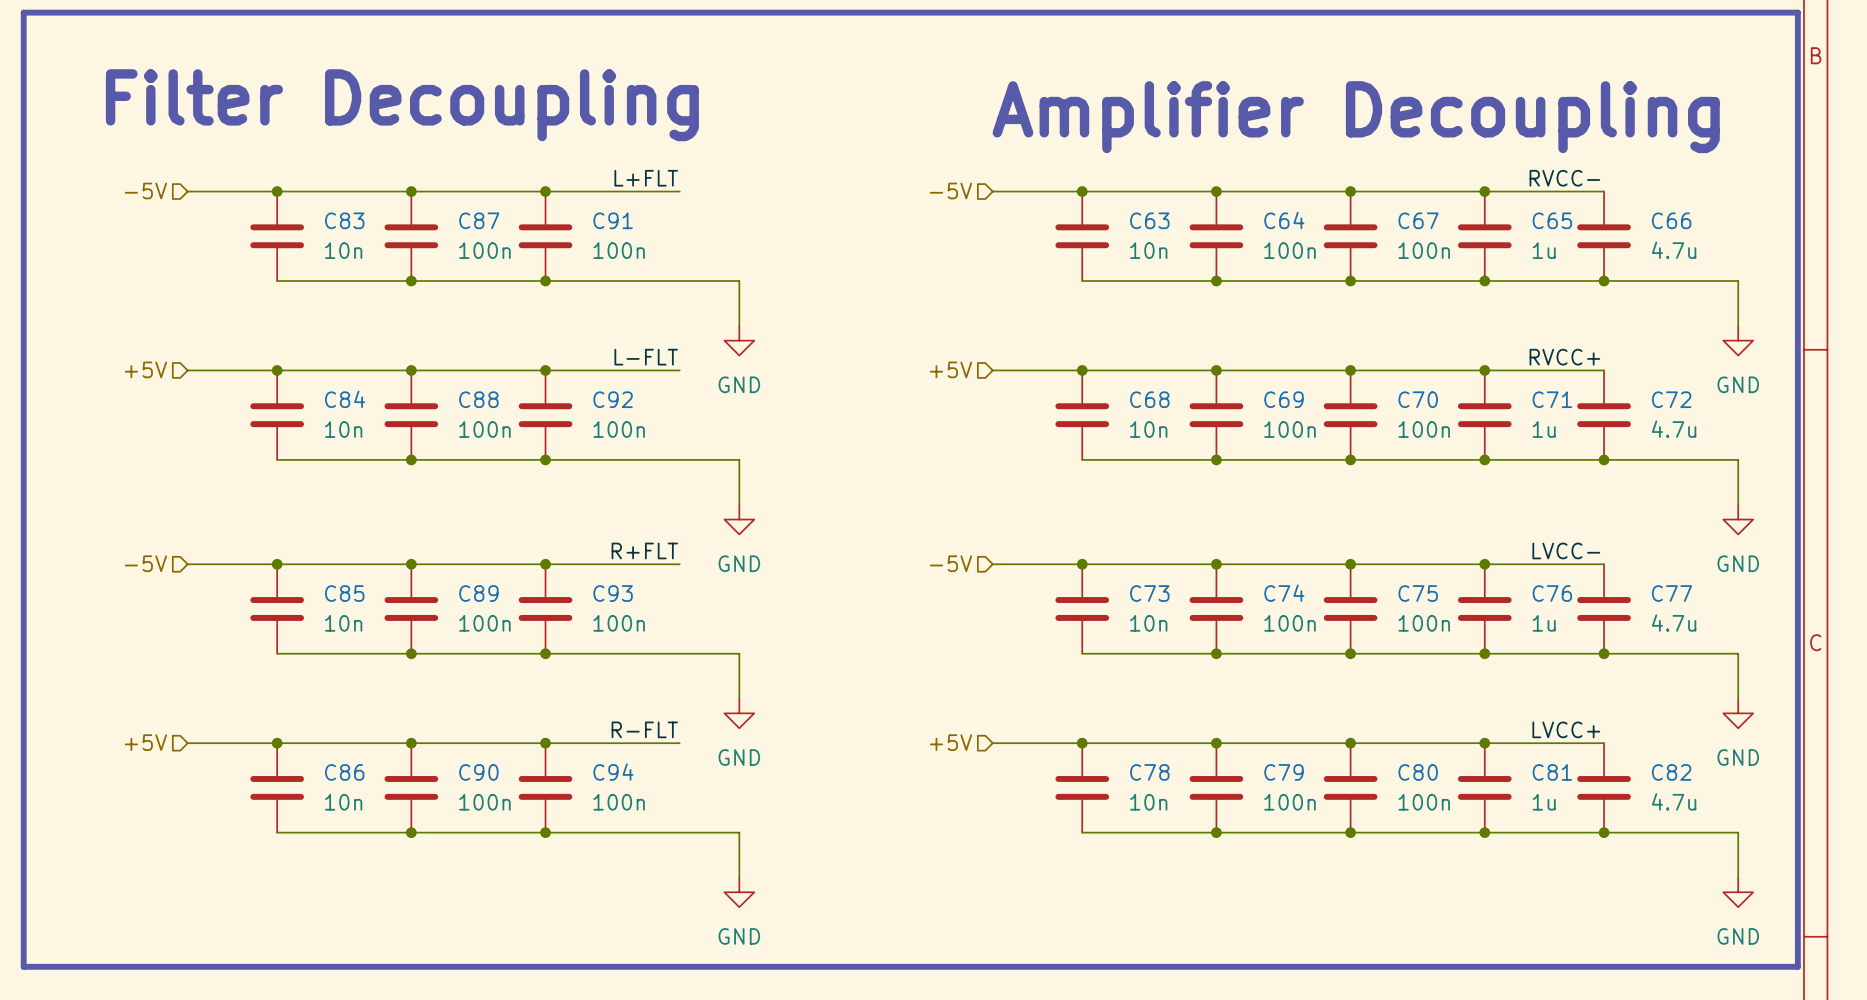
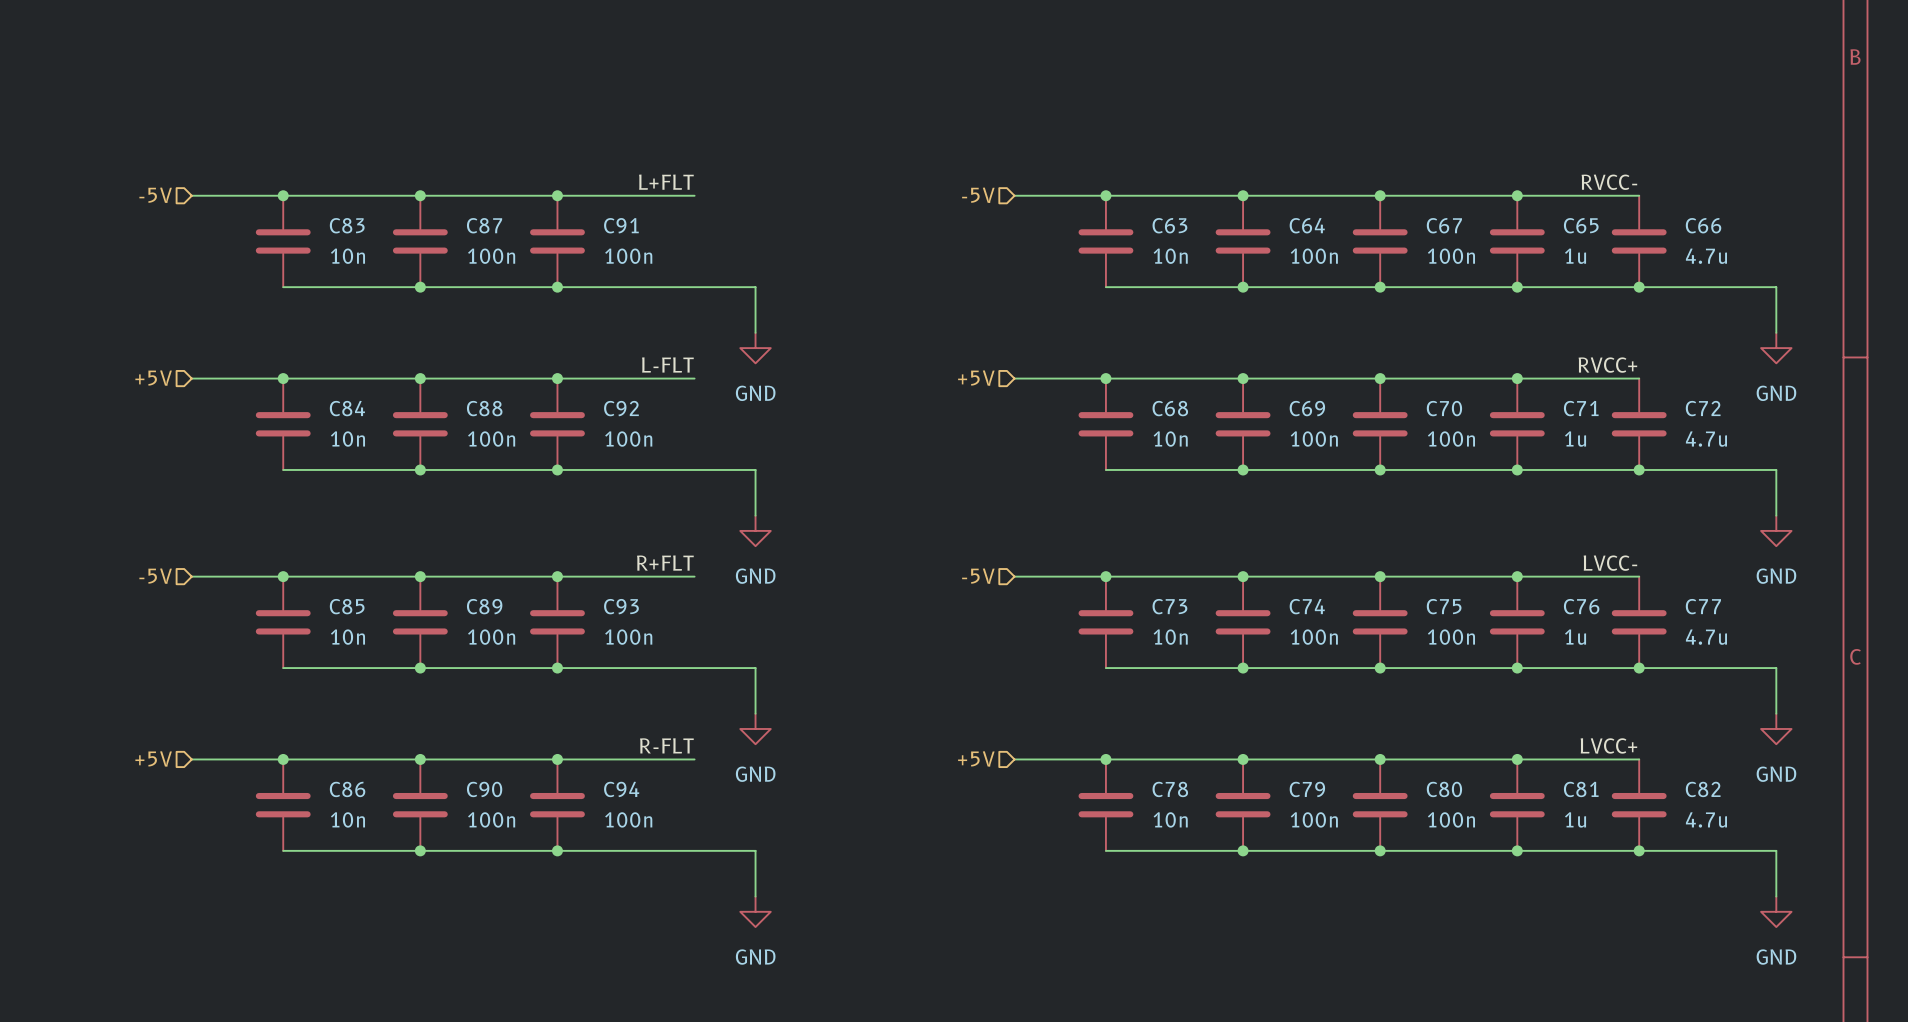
line: (23, 12) (1797, 12) (1797, 966) (23, 966) (23, 12) -> none
text: Filter Decoupling (402, 105) -> none
text: Amplifier Decoupling (1356, 117) -> none

